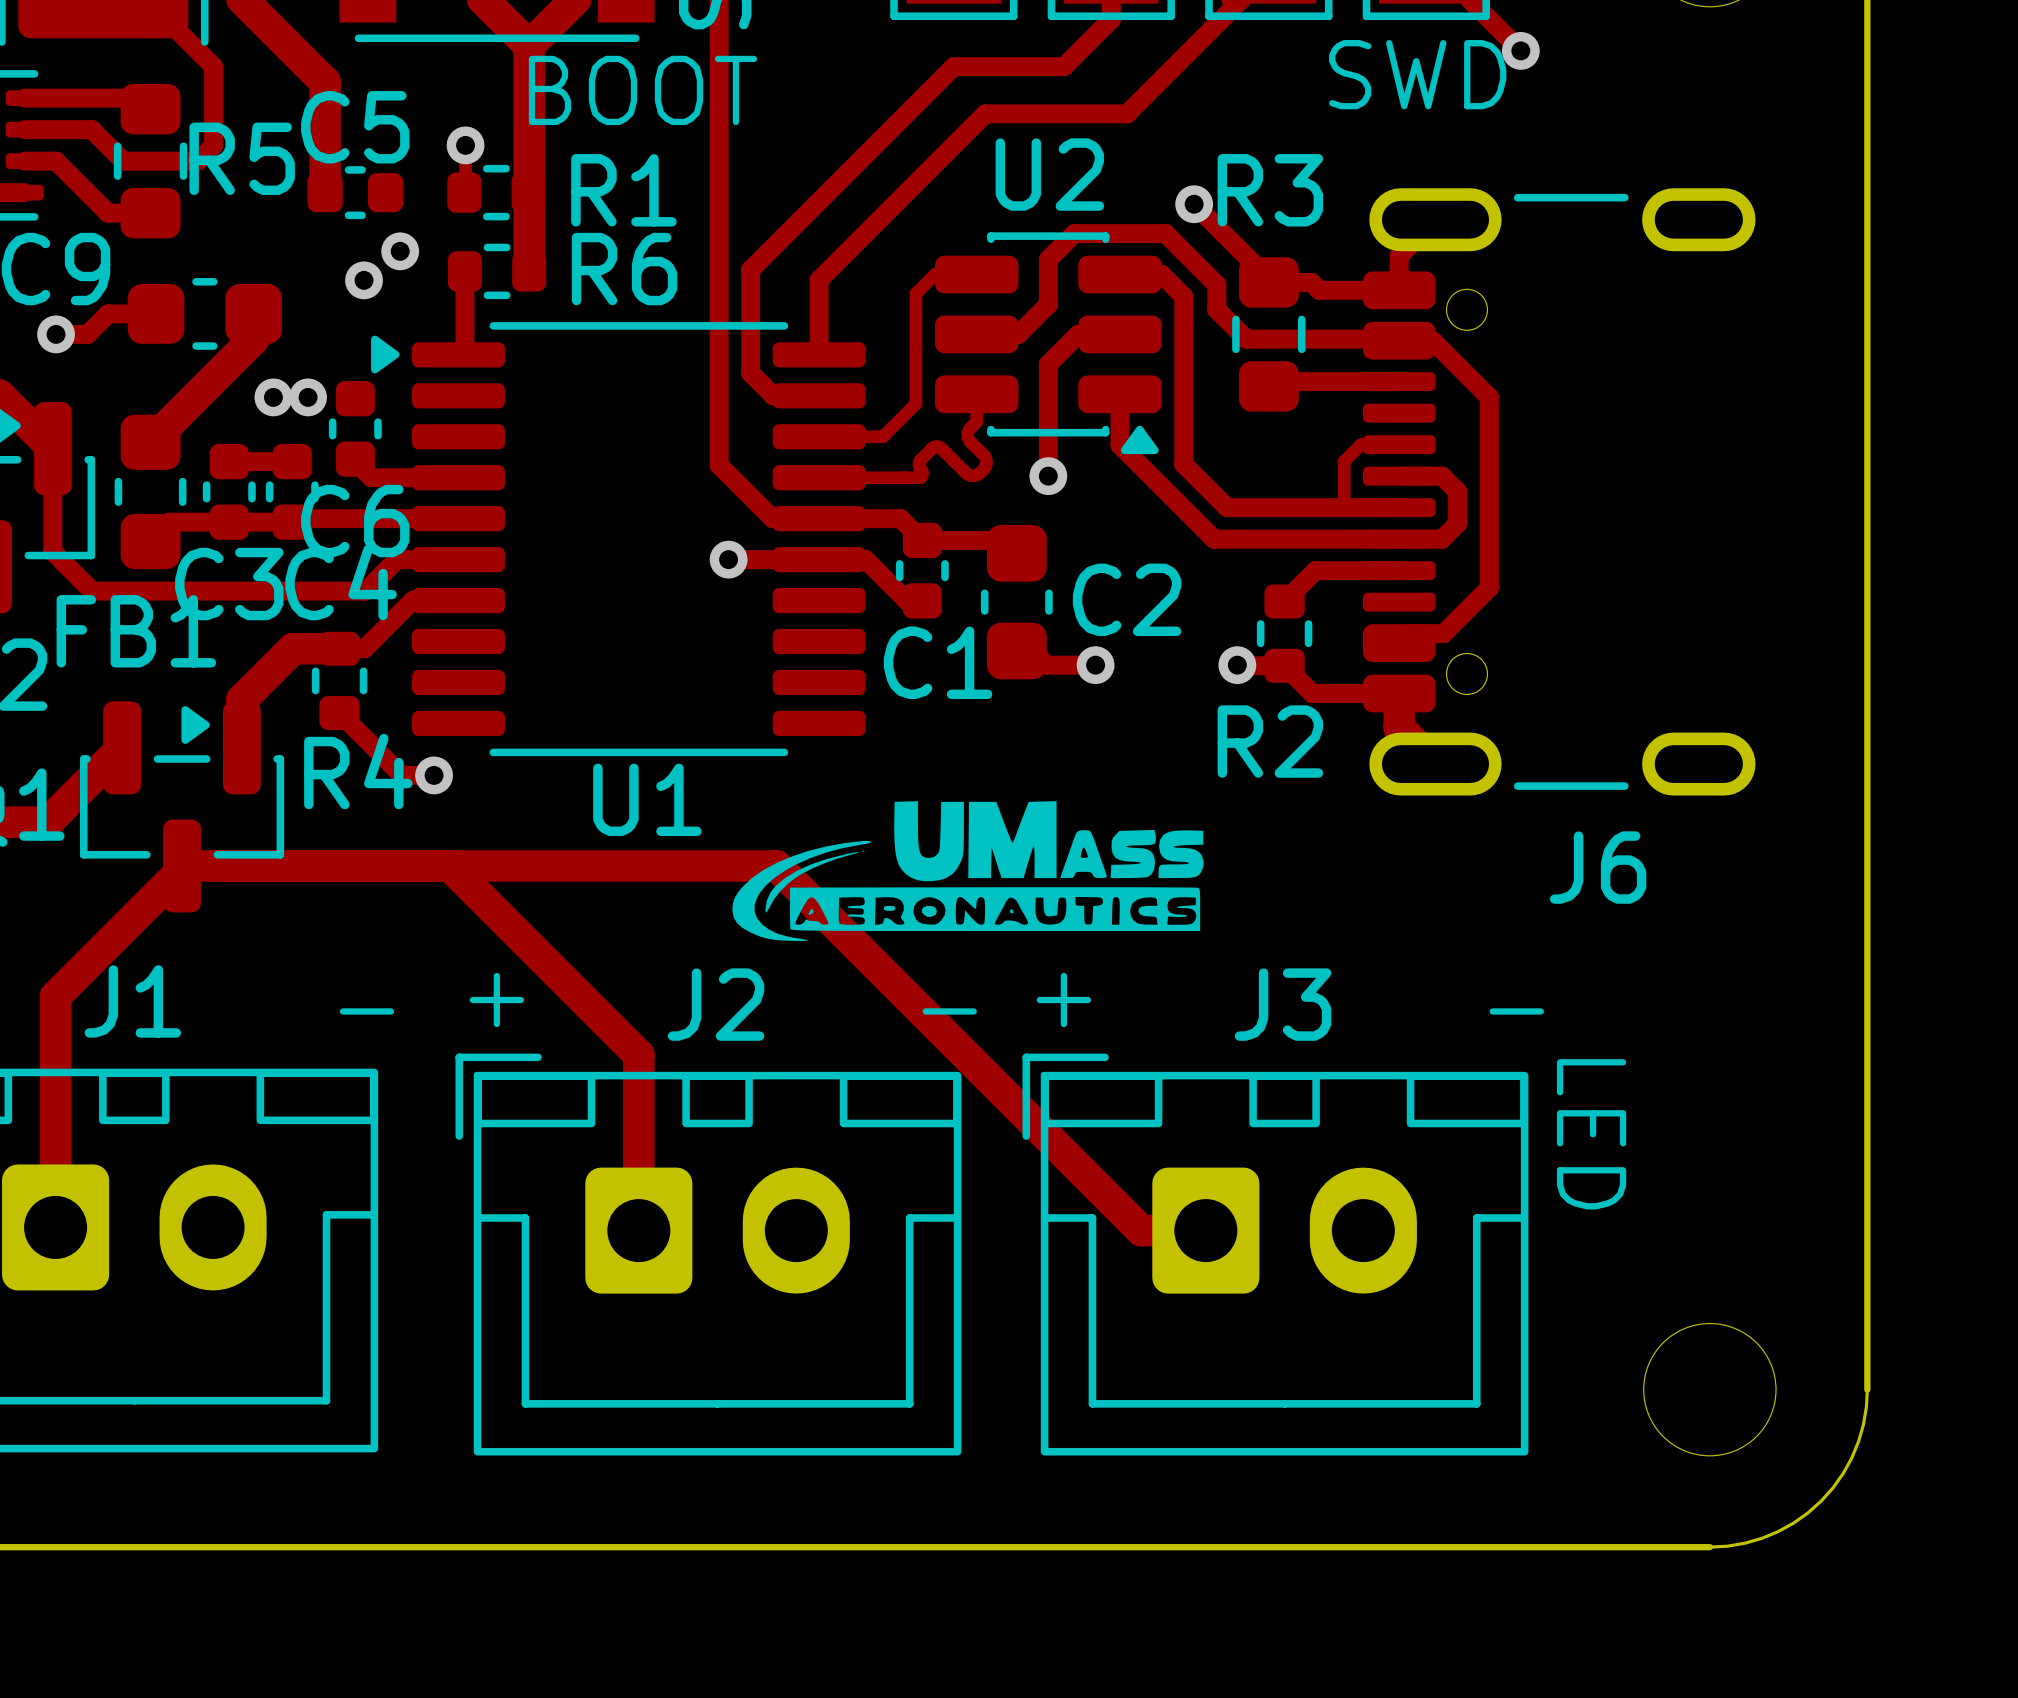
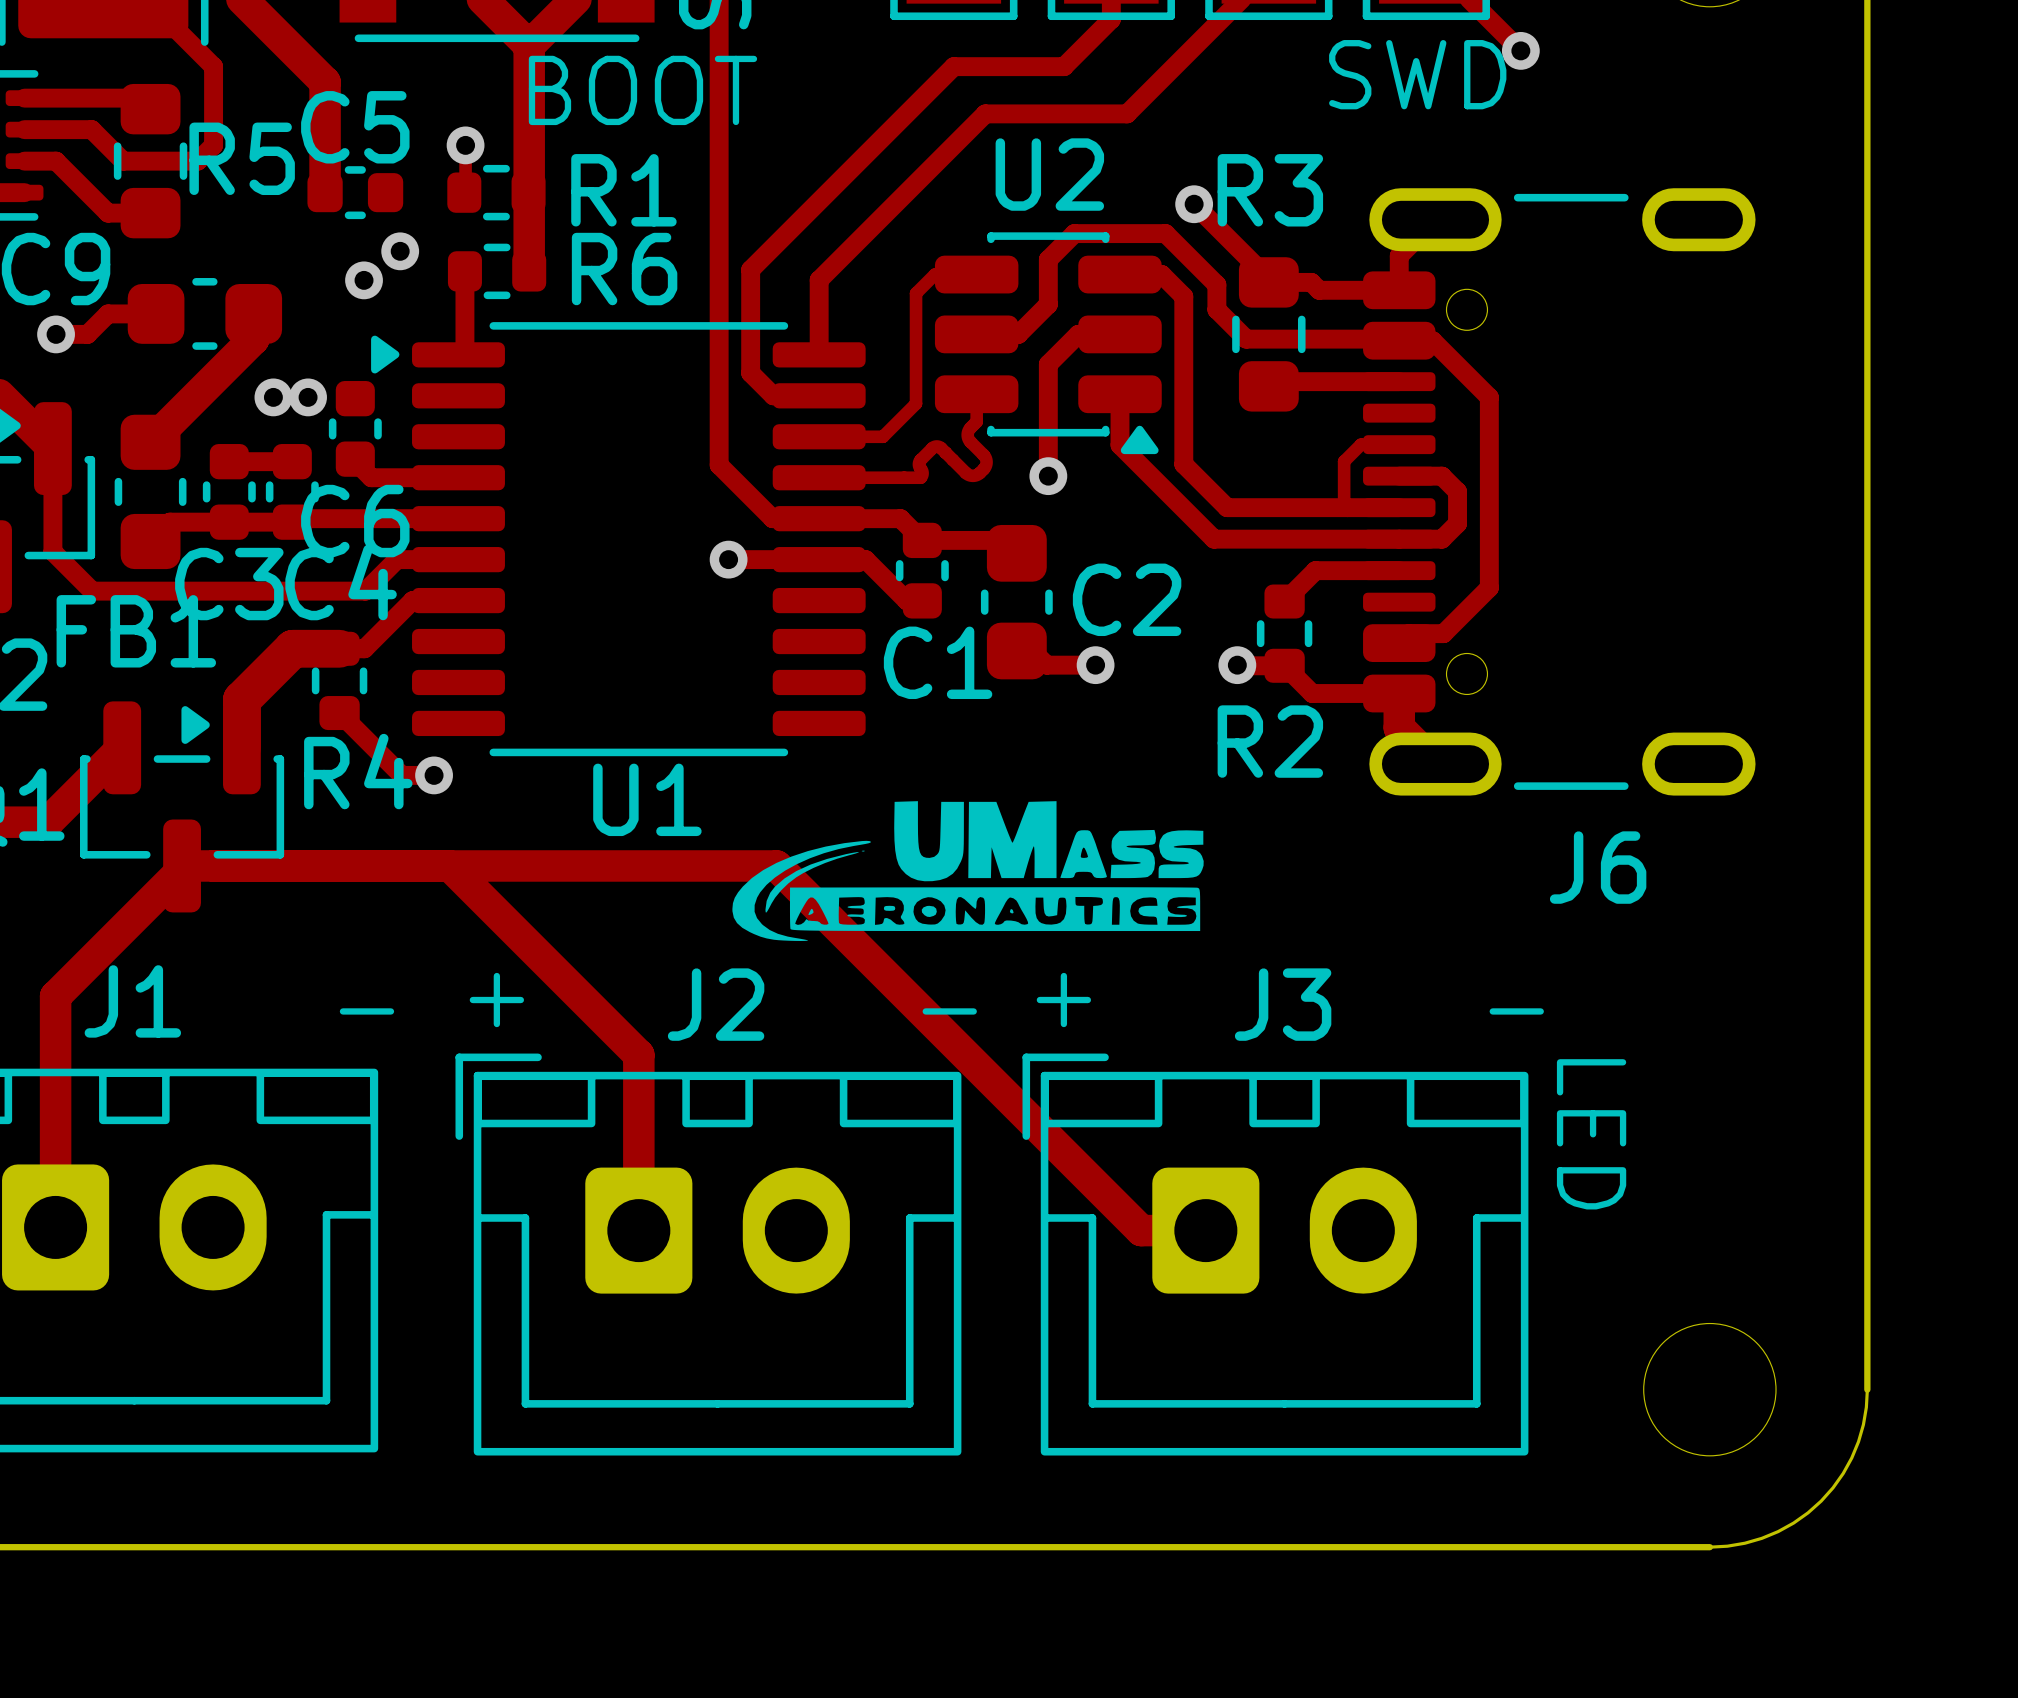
track width: thin (339, 648) (292, 648) (241, 699) (241, 747) -> thick (339, 648) (292, 648) (241, 699) (241, 747)

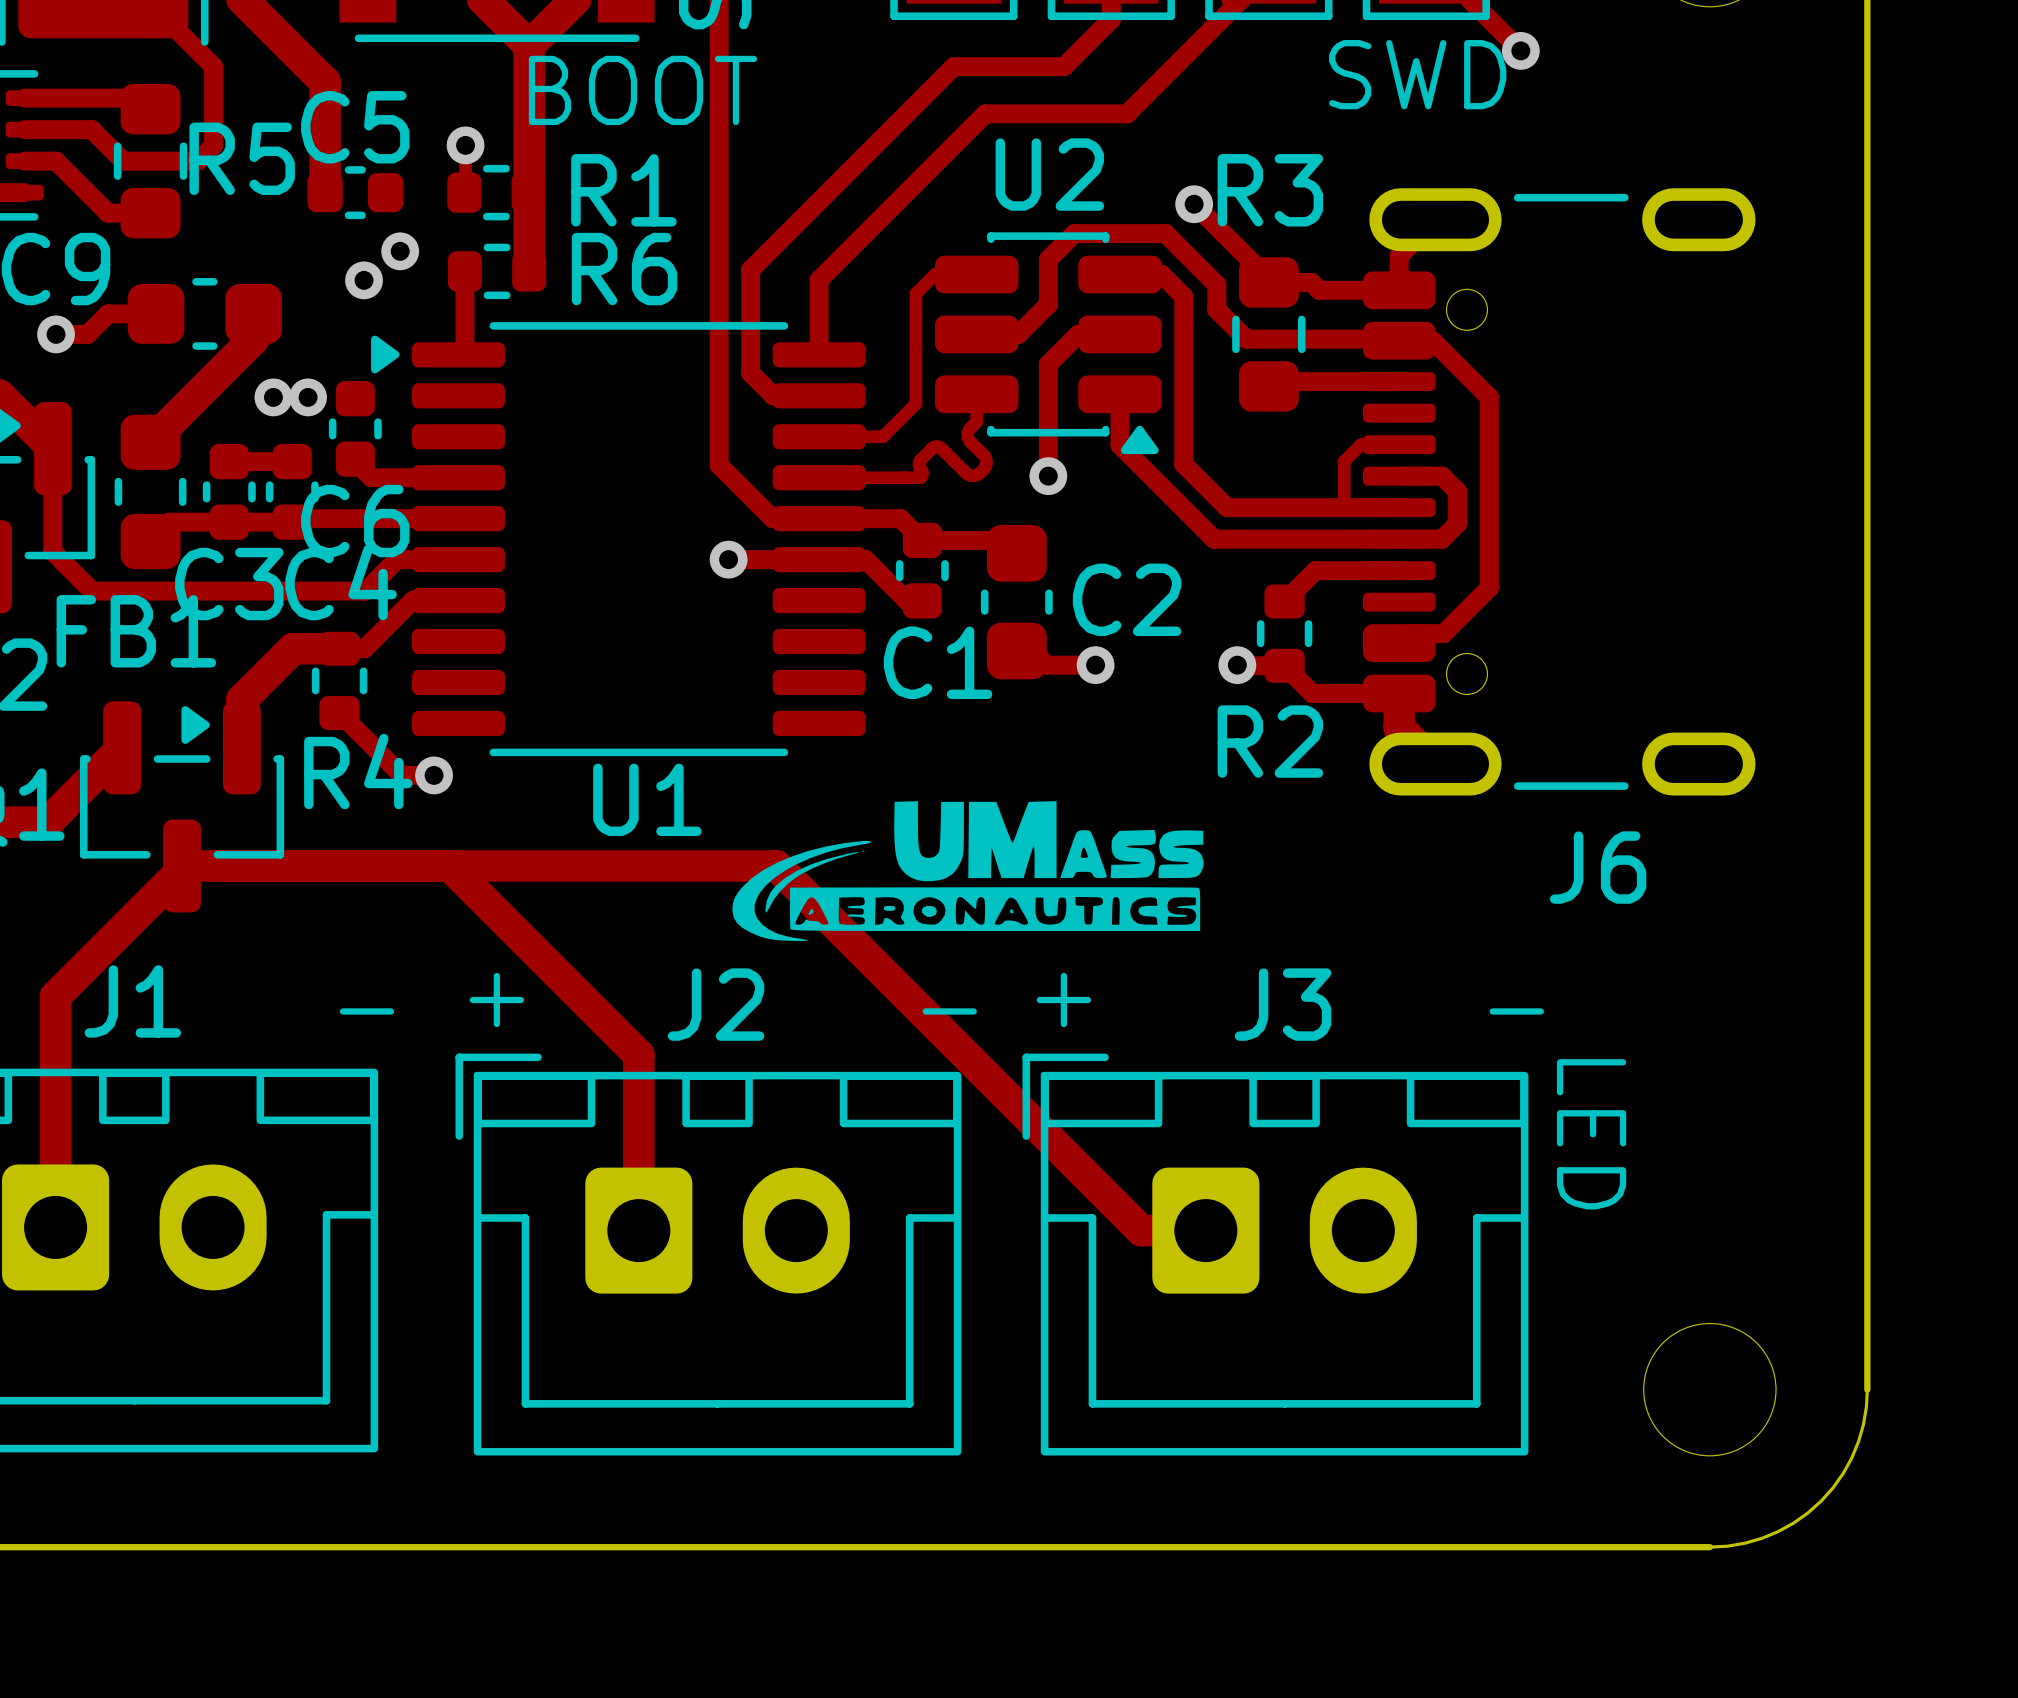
track width: thick (339, 648) (292, 648) (241, 699) (241, 747) -> thin (339, 648) (292, 648) (241, 699) (241, 747)

